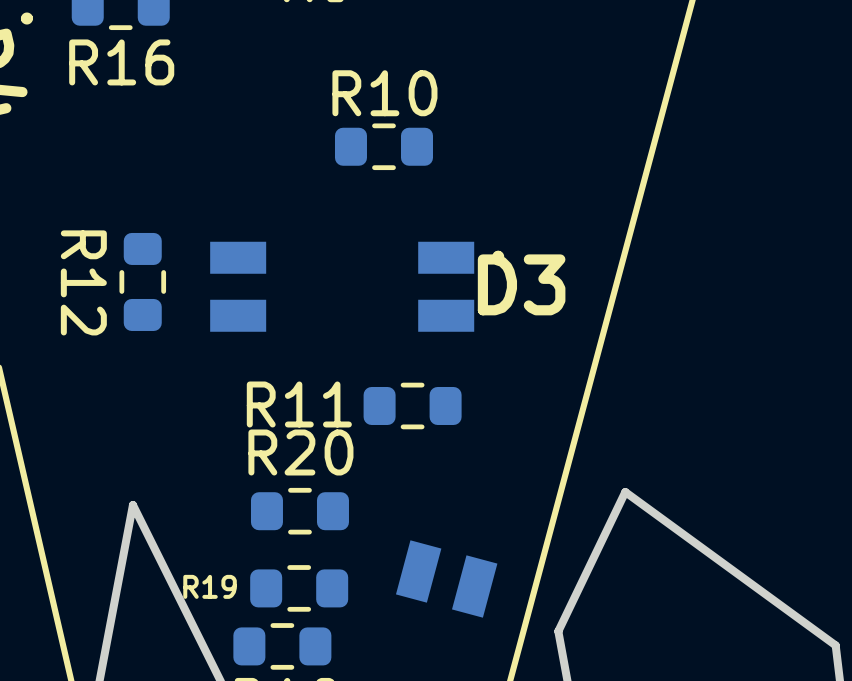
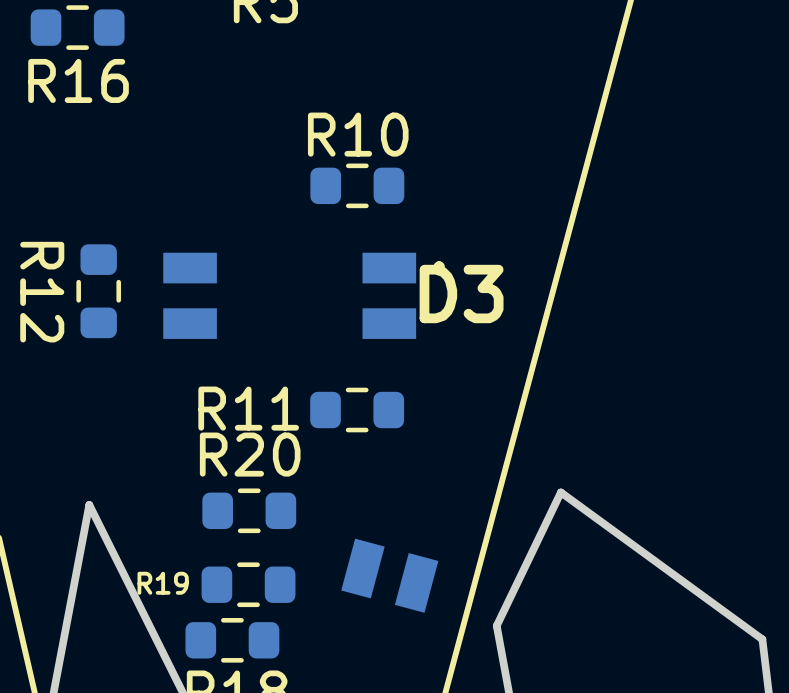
R10 position: (383, 146) -> (357, 185)

